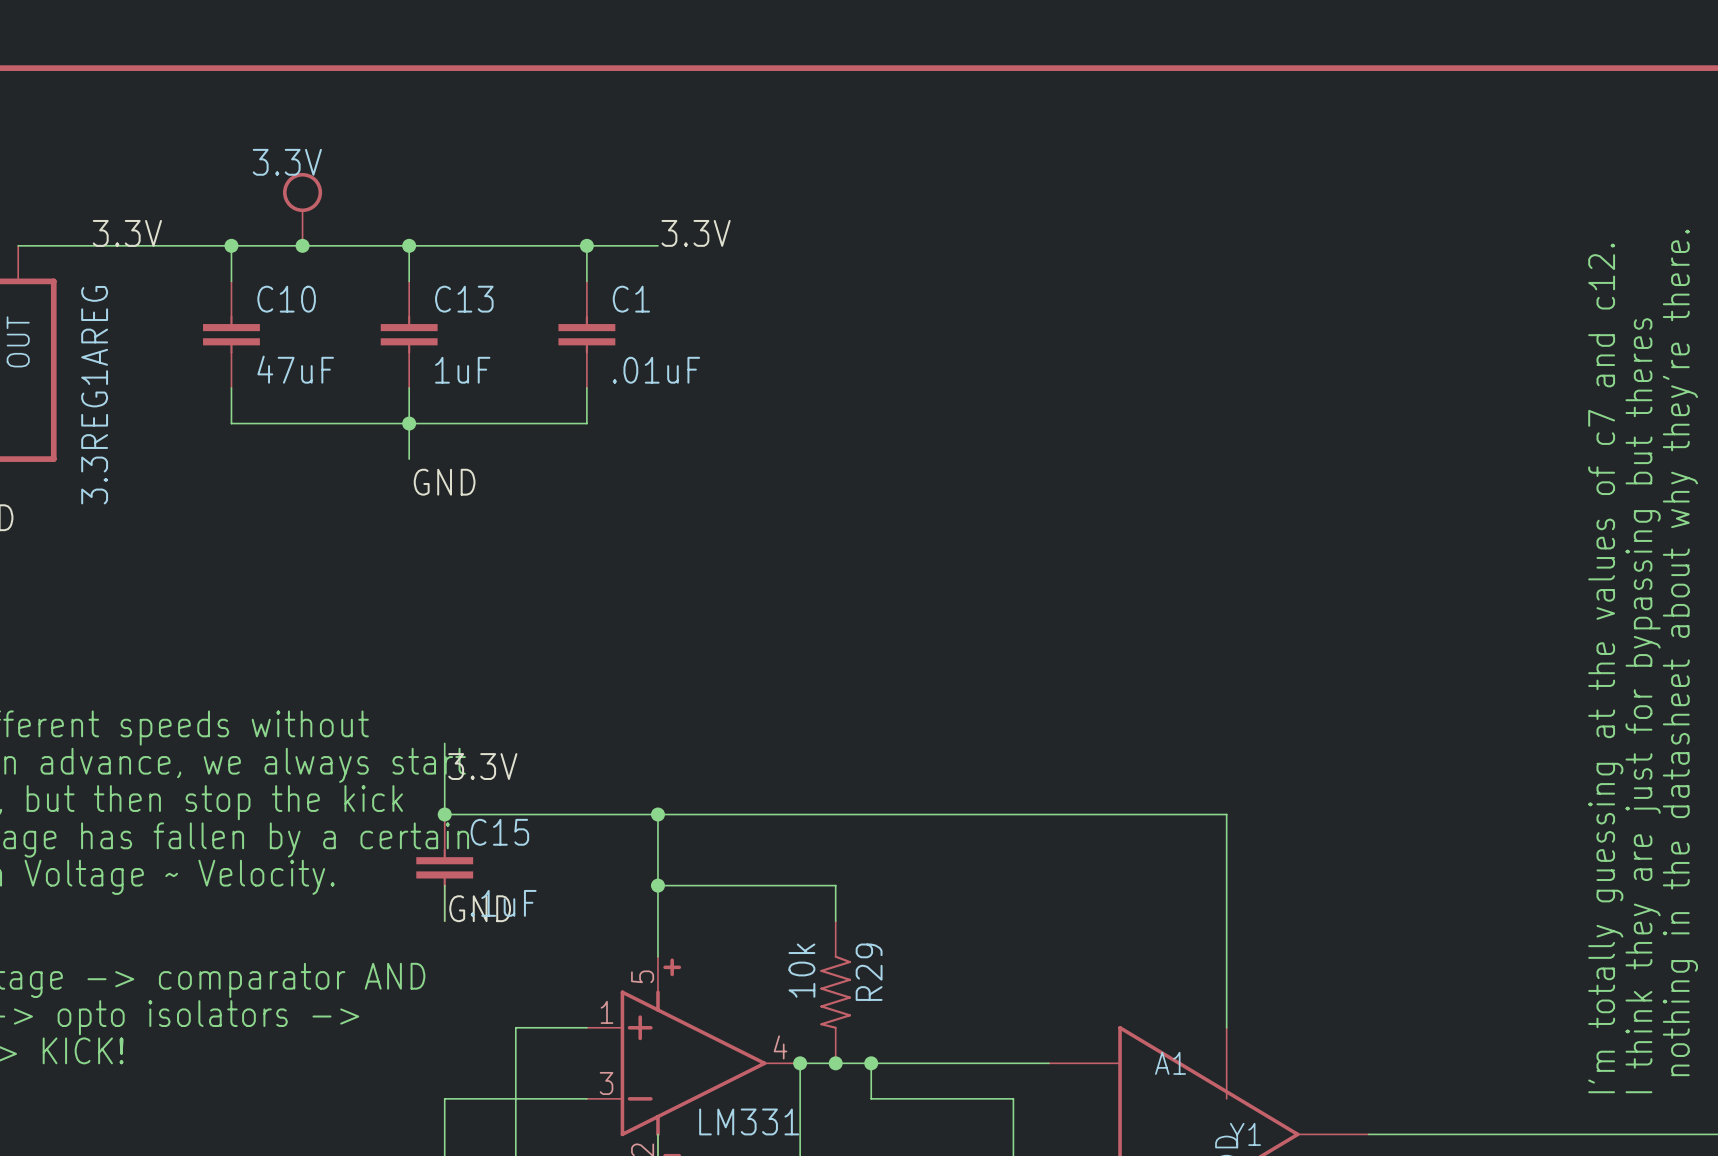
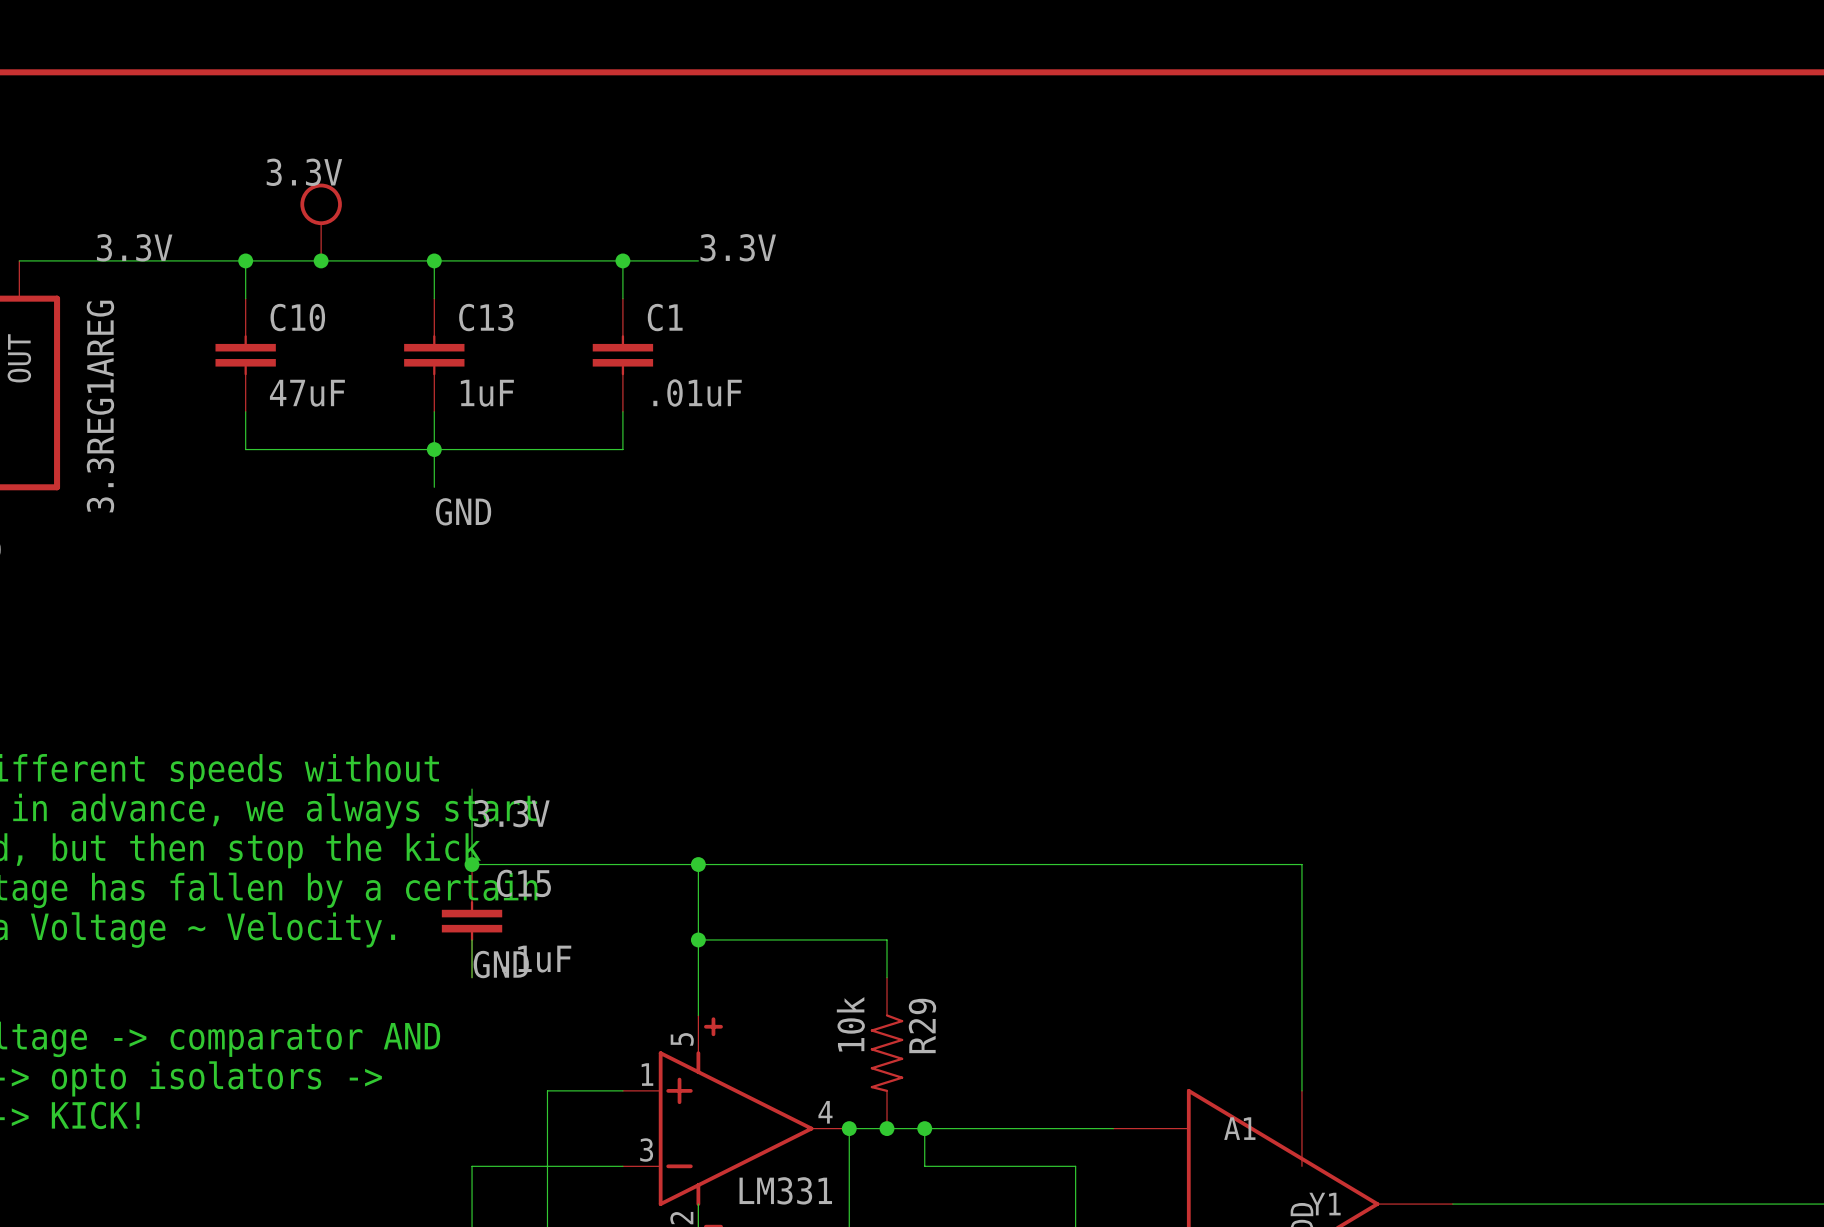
text: nothing in the datasheet about why they're there. (1680, 652) -> none
text: I'm totally guessing at the values of c7 and c12. (1605, 668) -> none
text: I think they are just for bypassing but theres (1643, 705) -> none

